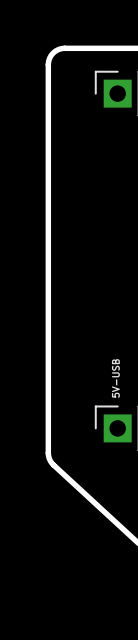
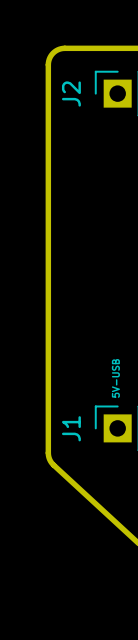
J2 name: none -> J2 (71, 94)
J1 name: none -> J1 (71, 428)

